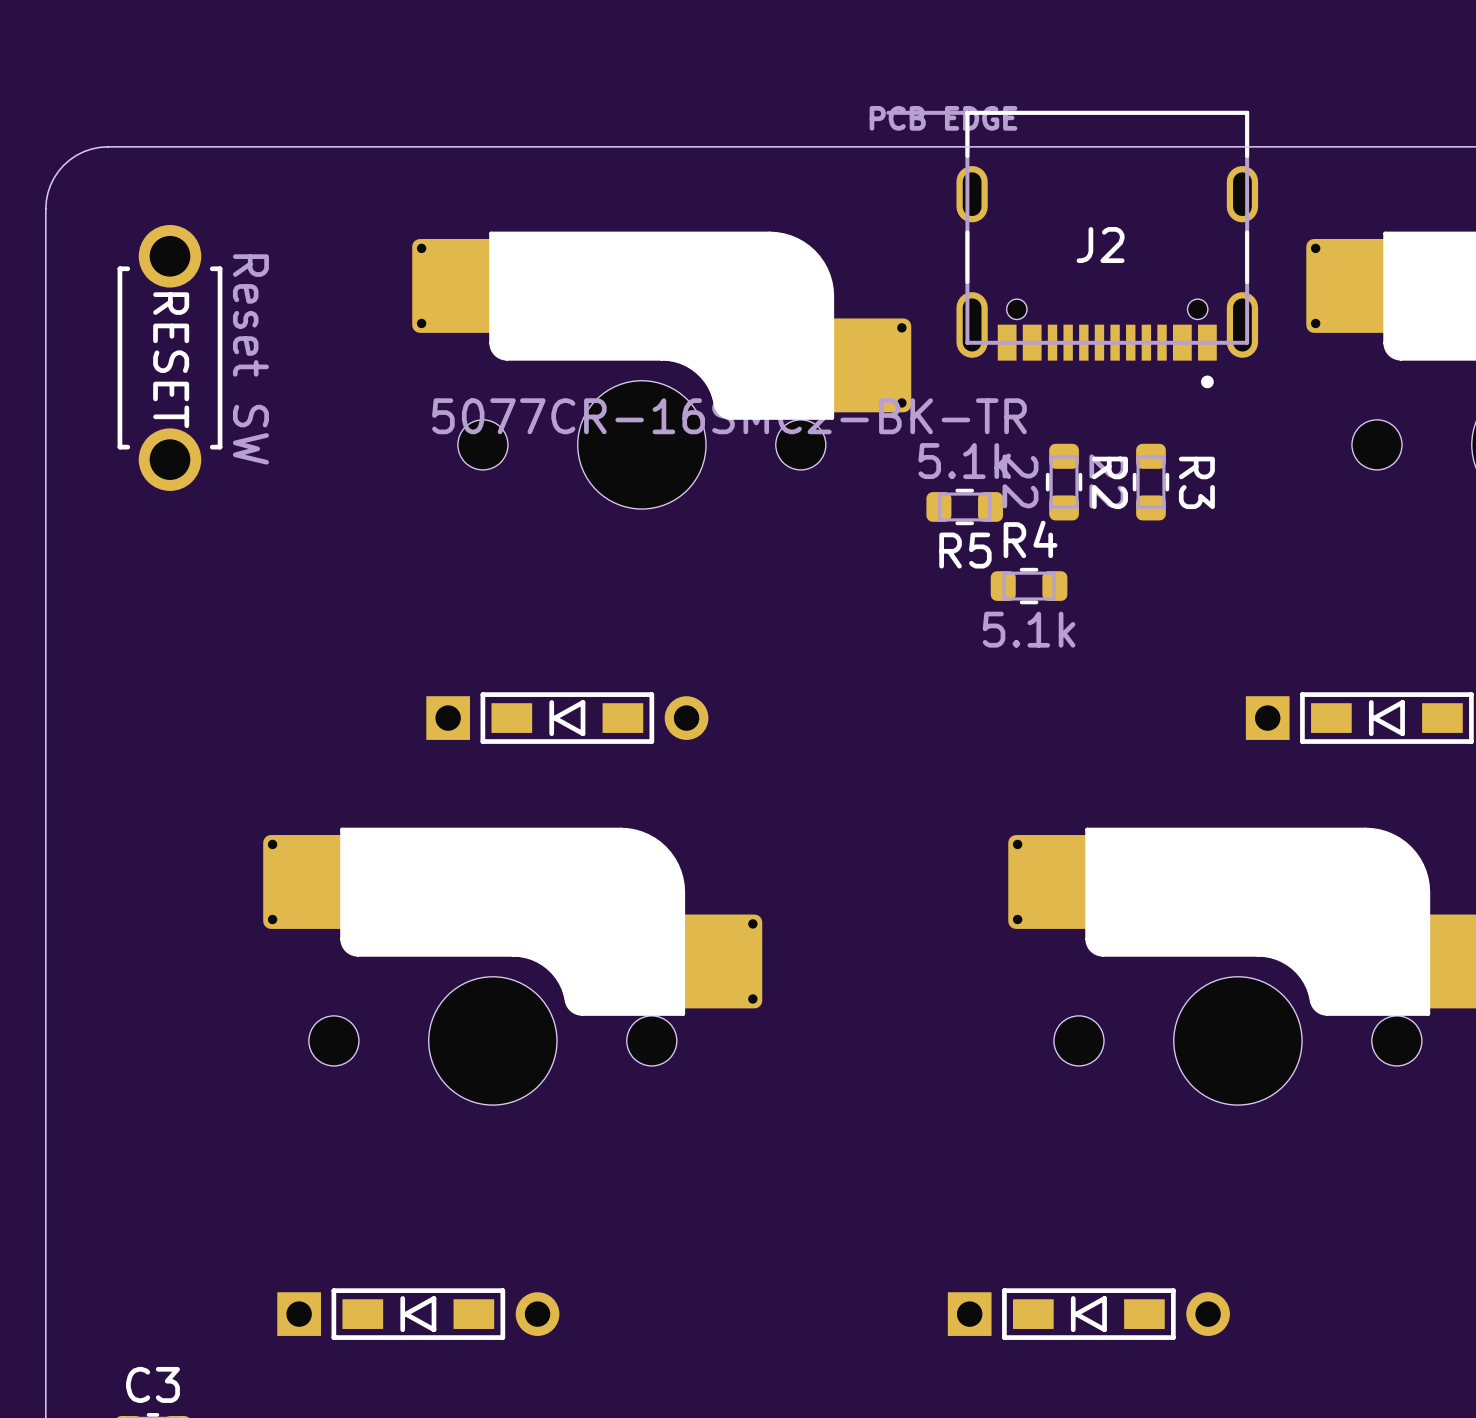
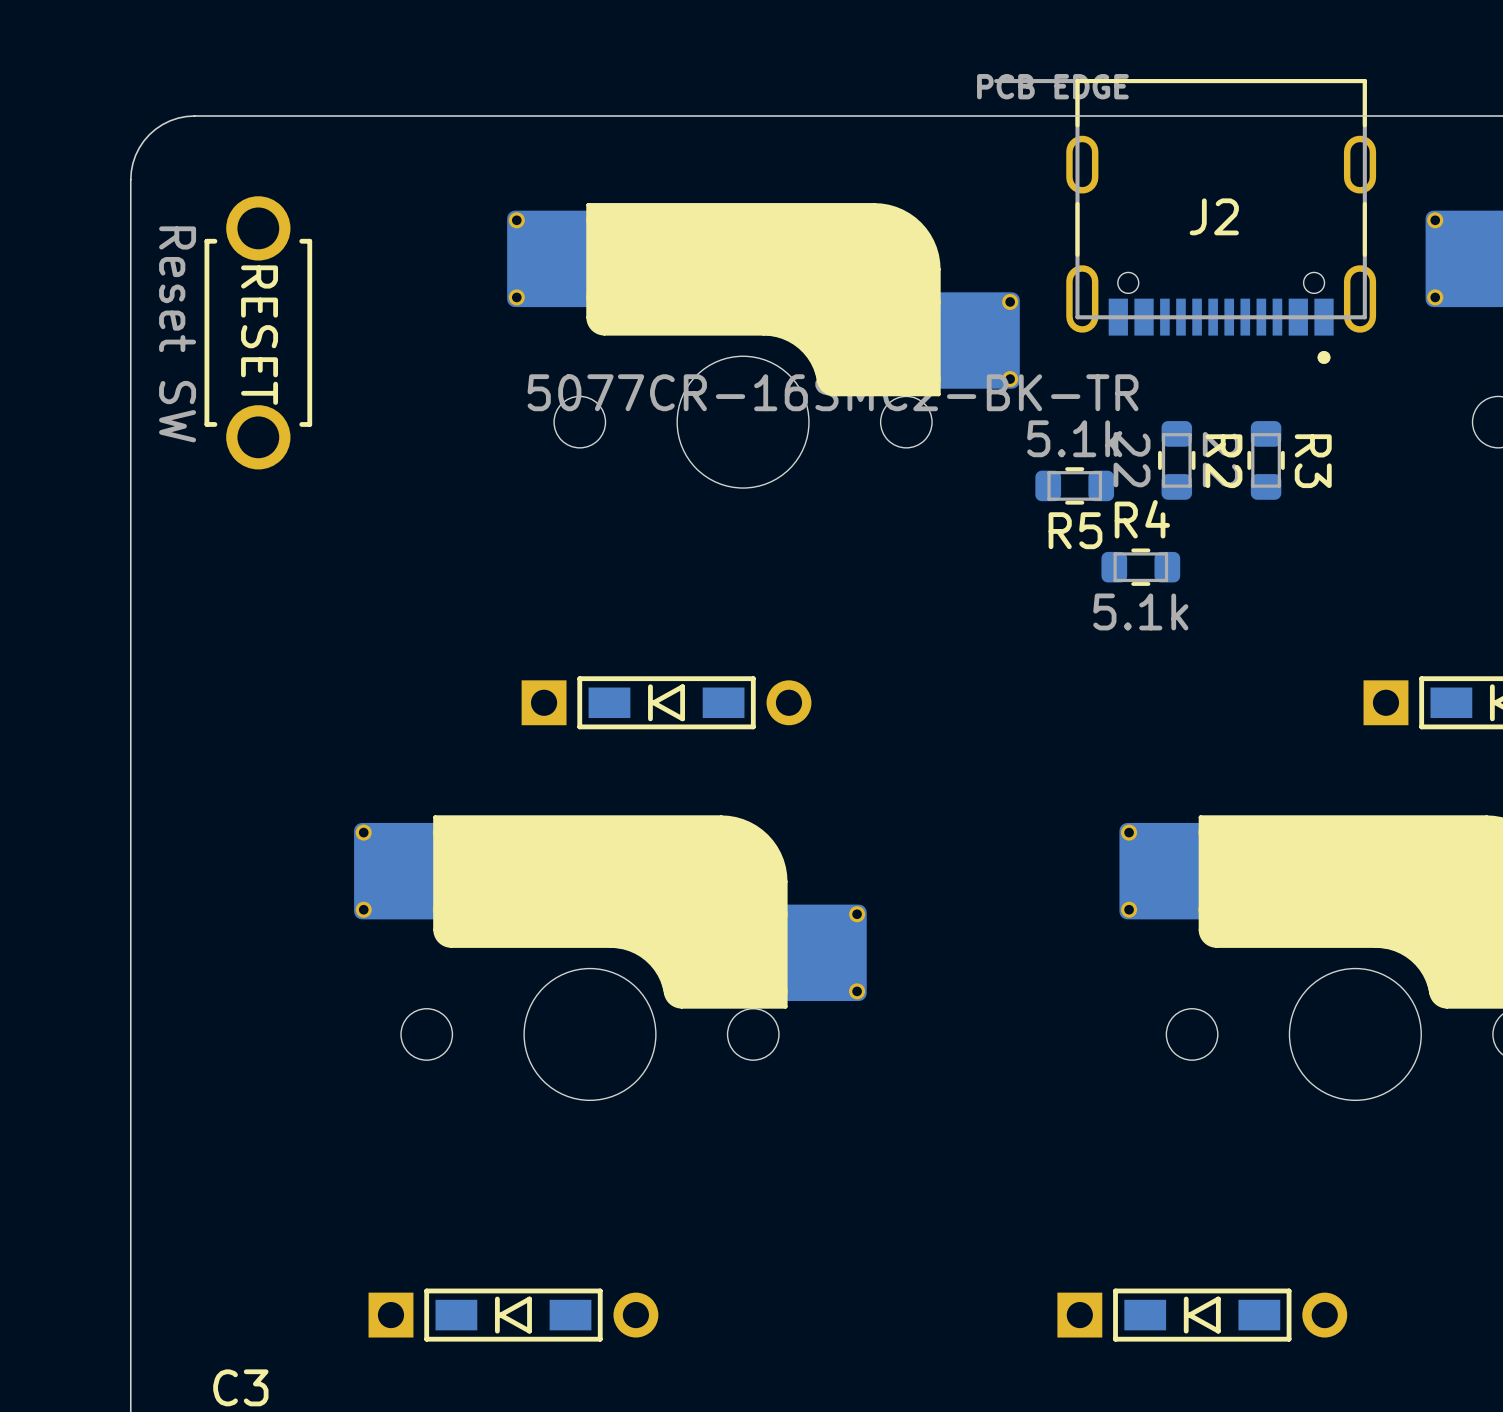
part value position: Reset SW (250, 359) -> Reset SW (177, 334)

